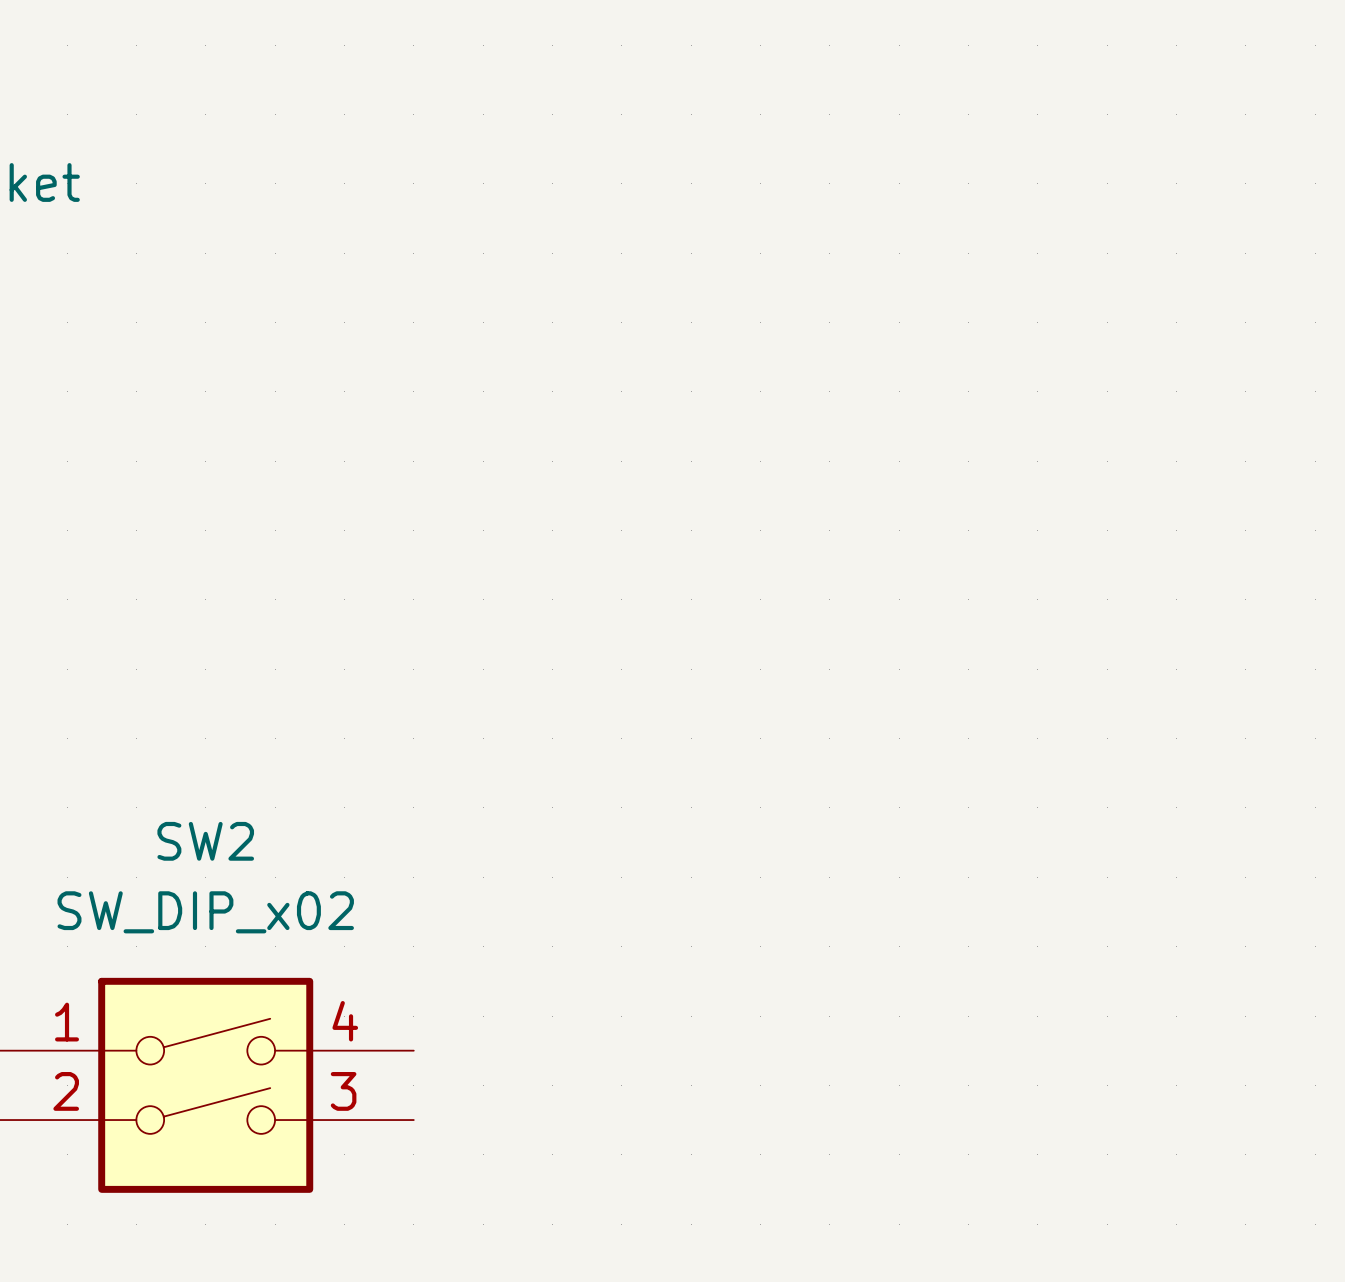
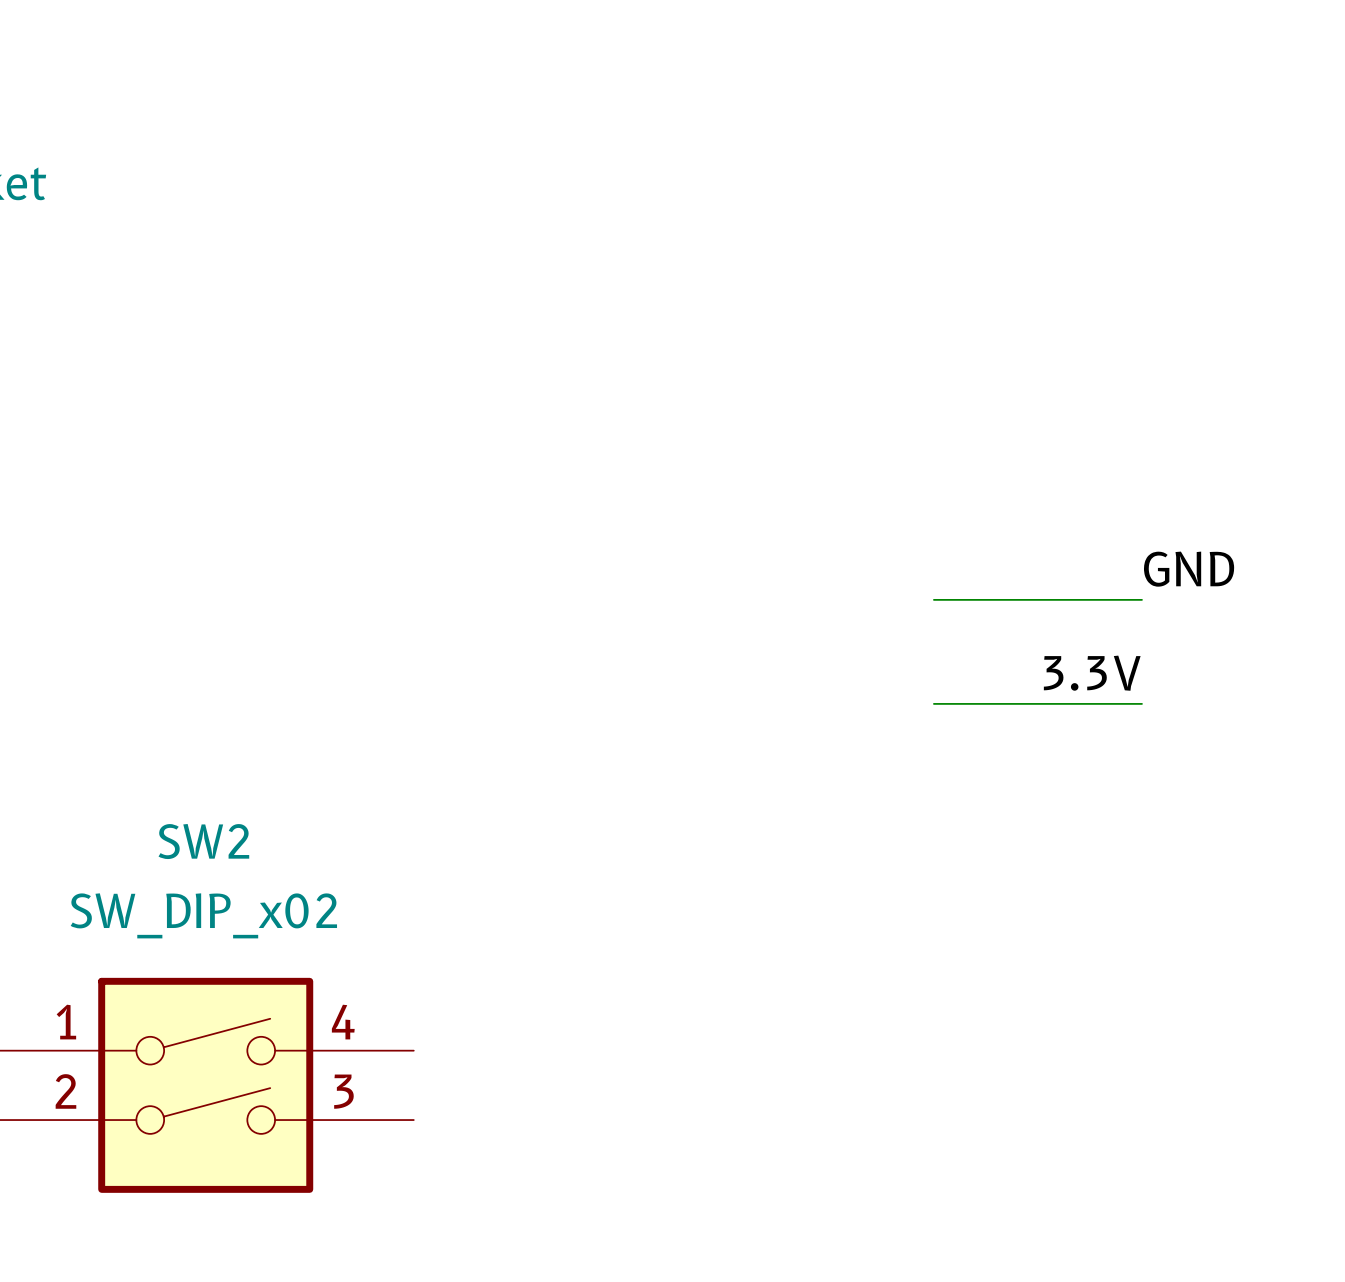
label: none -> GND (1189, 569)
wire: none -> (933, 599) (1141, 599)
label: none -> 3.3V (1092, 673)
wire: none -> (933, 703) (1141, 703)

